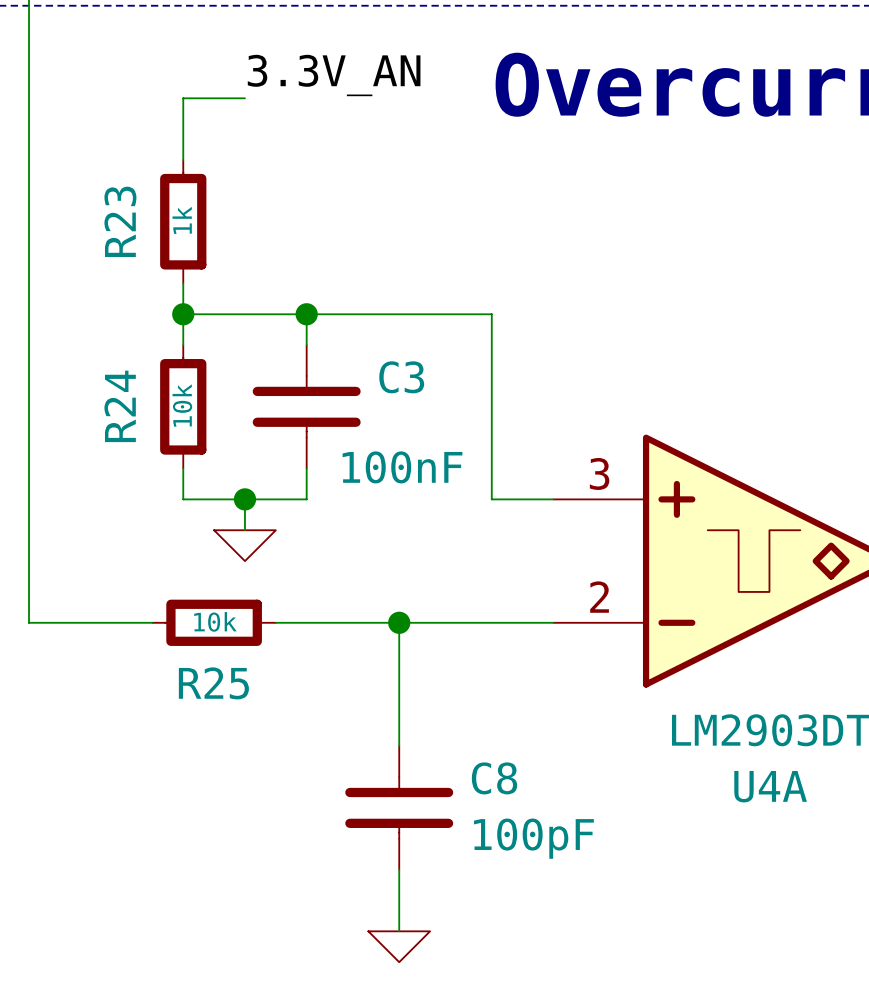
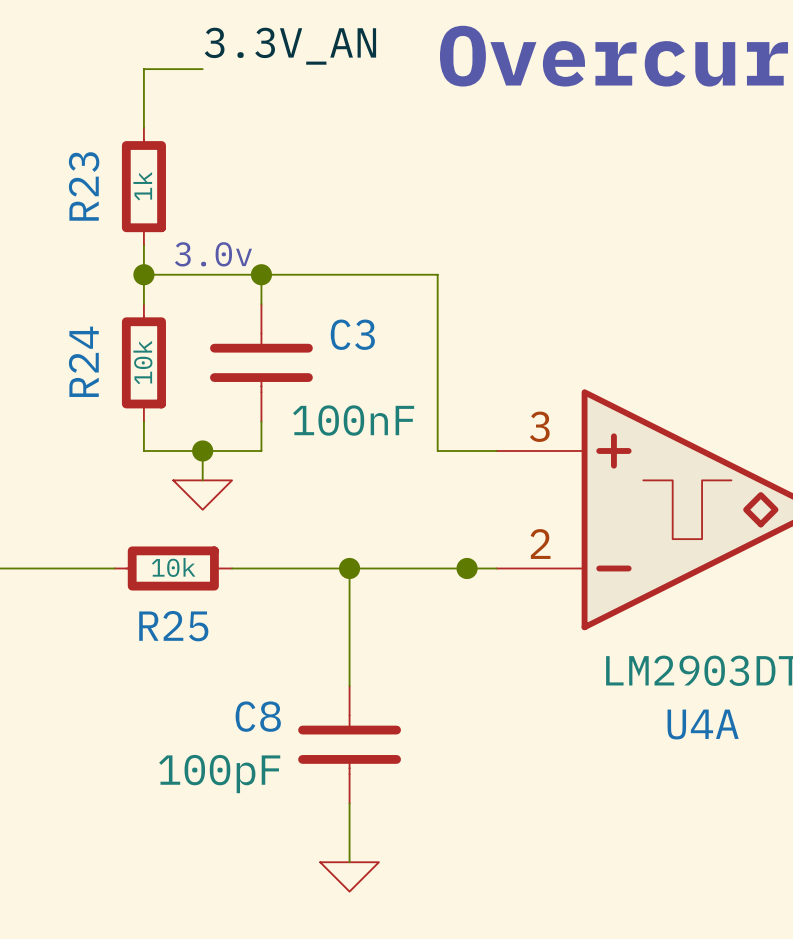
text: none -> 3.0v (213, 254)
junction: none -> (467, 568)
C8 name position: C8 (494, 778) -> C8 (258, 716)
C8 value position: 100pF (533, 838) -> 100pF (219, 774)

